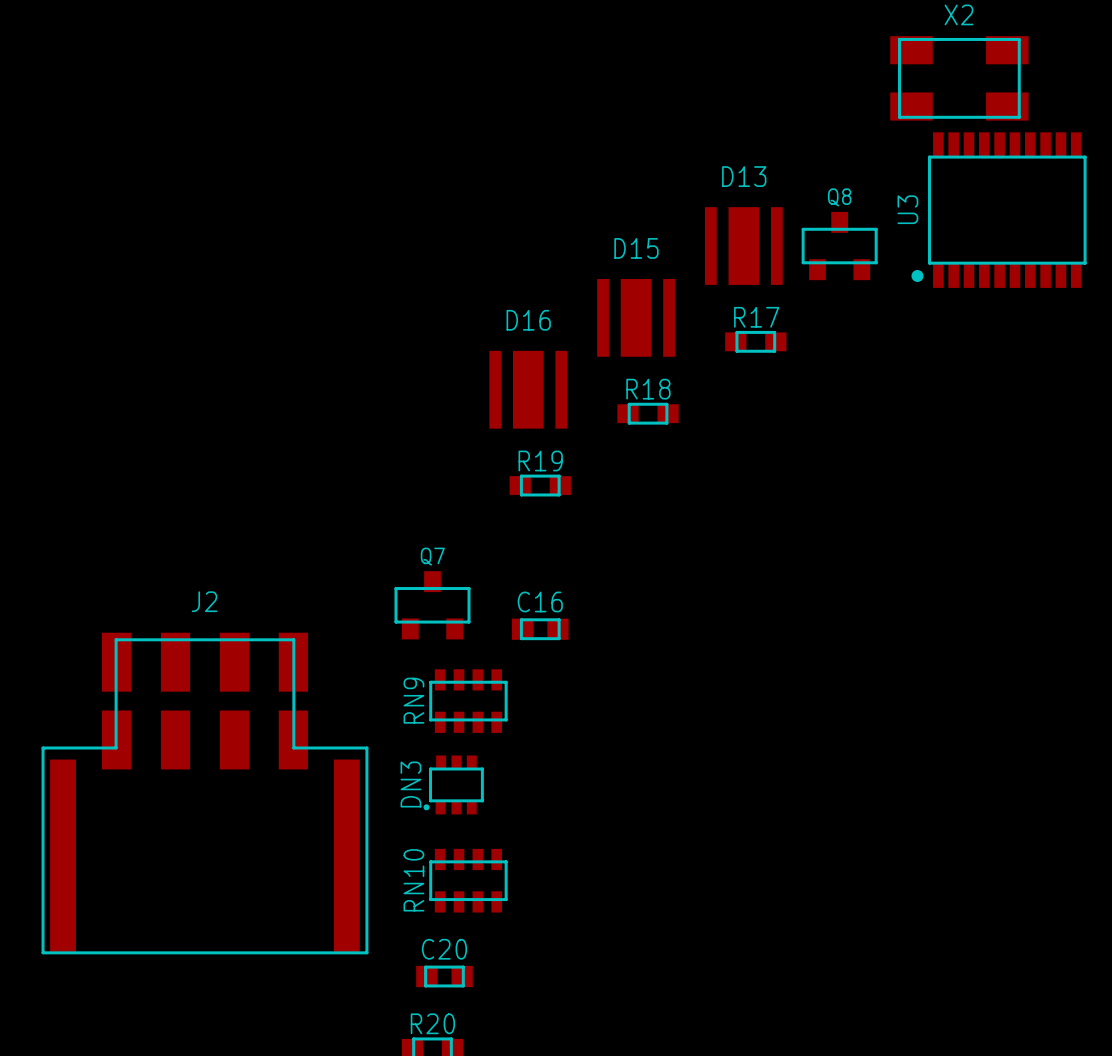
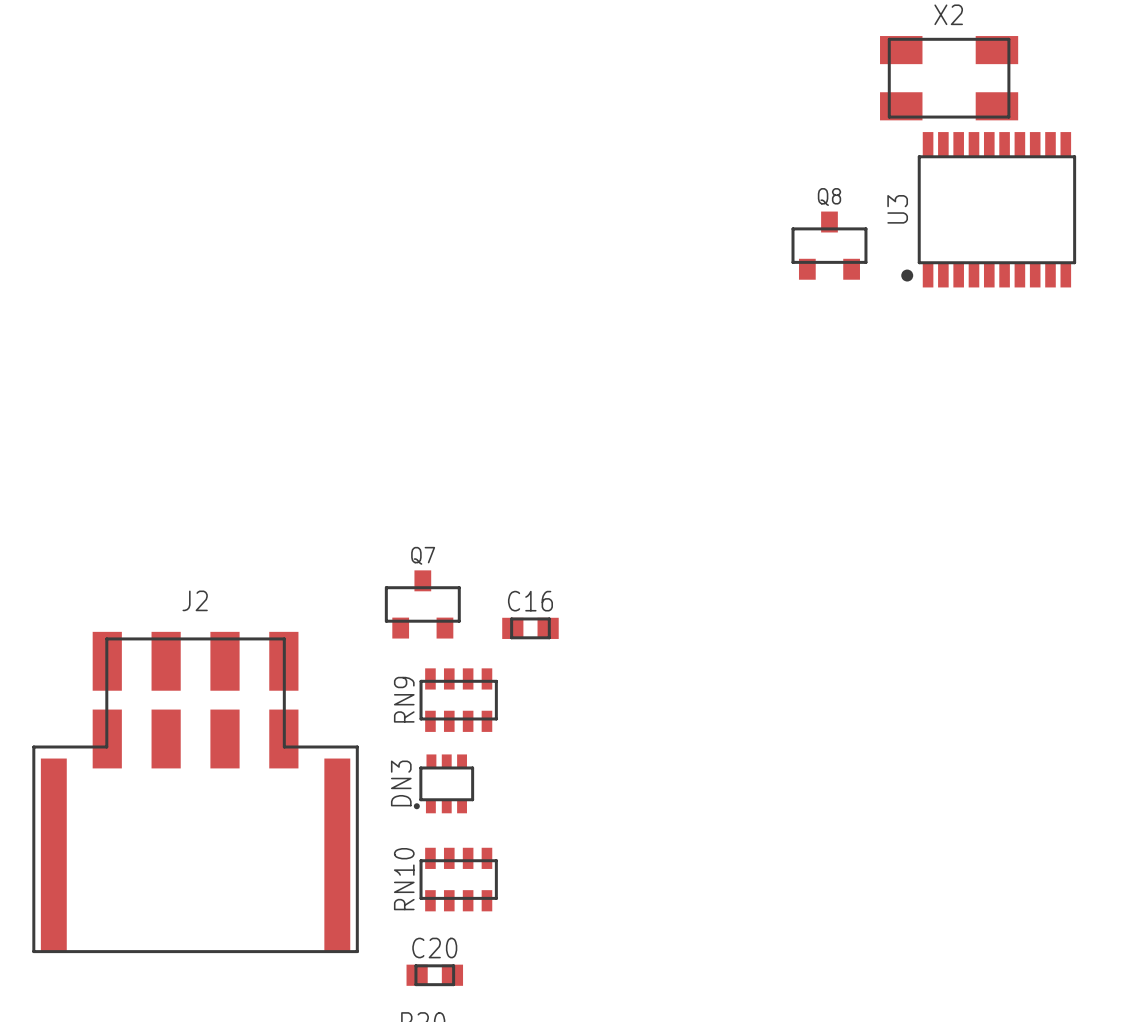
D13: (743, 246) -> none
D15: (636, 317) -> none
R17: (755, 341) -> none
D16: (528, 389) -> none
R18: (648, 413) -> none
R19: (540, 485) -> none

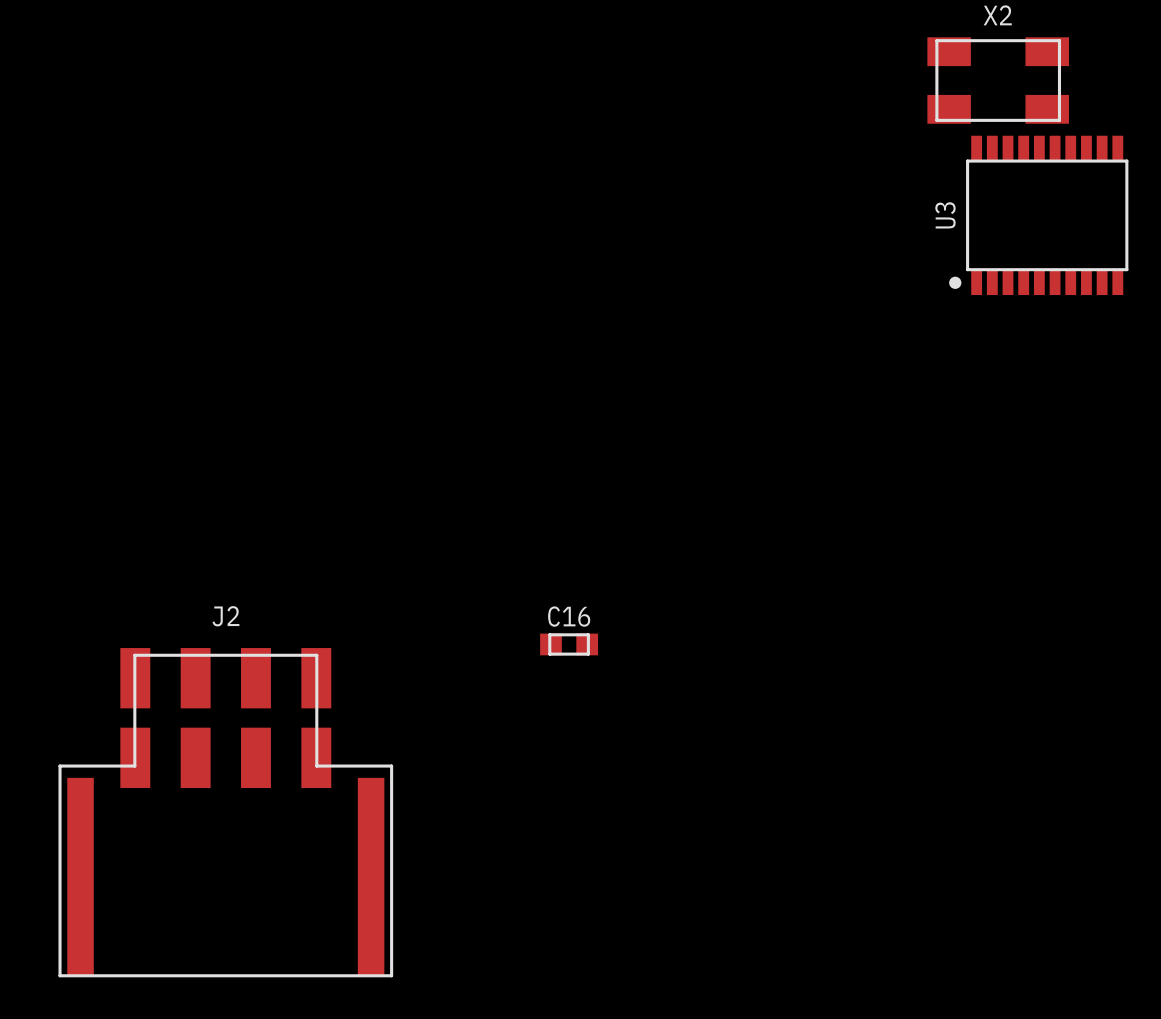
Q8: (829, 245) -> none
Q7: (422, 604) -> none
RN9: (458, 700) -> none
DN3: (443, 783) -> none
RN10: (458, 879) -> none
C20: (434, 975) -> none

